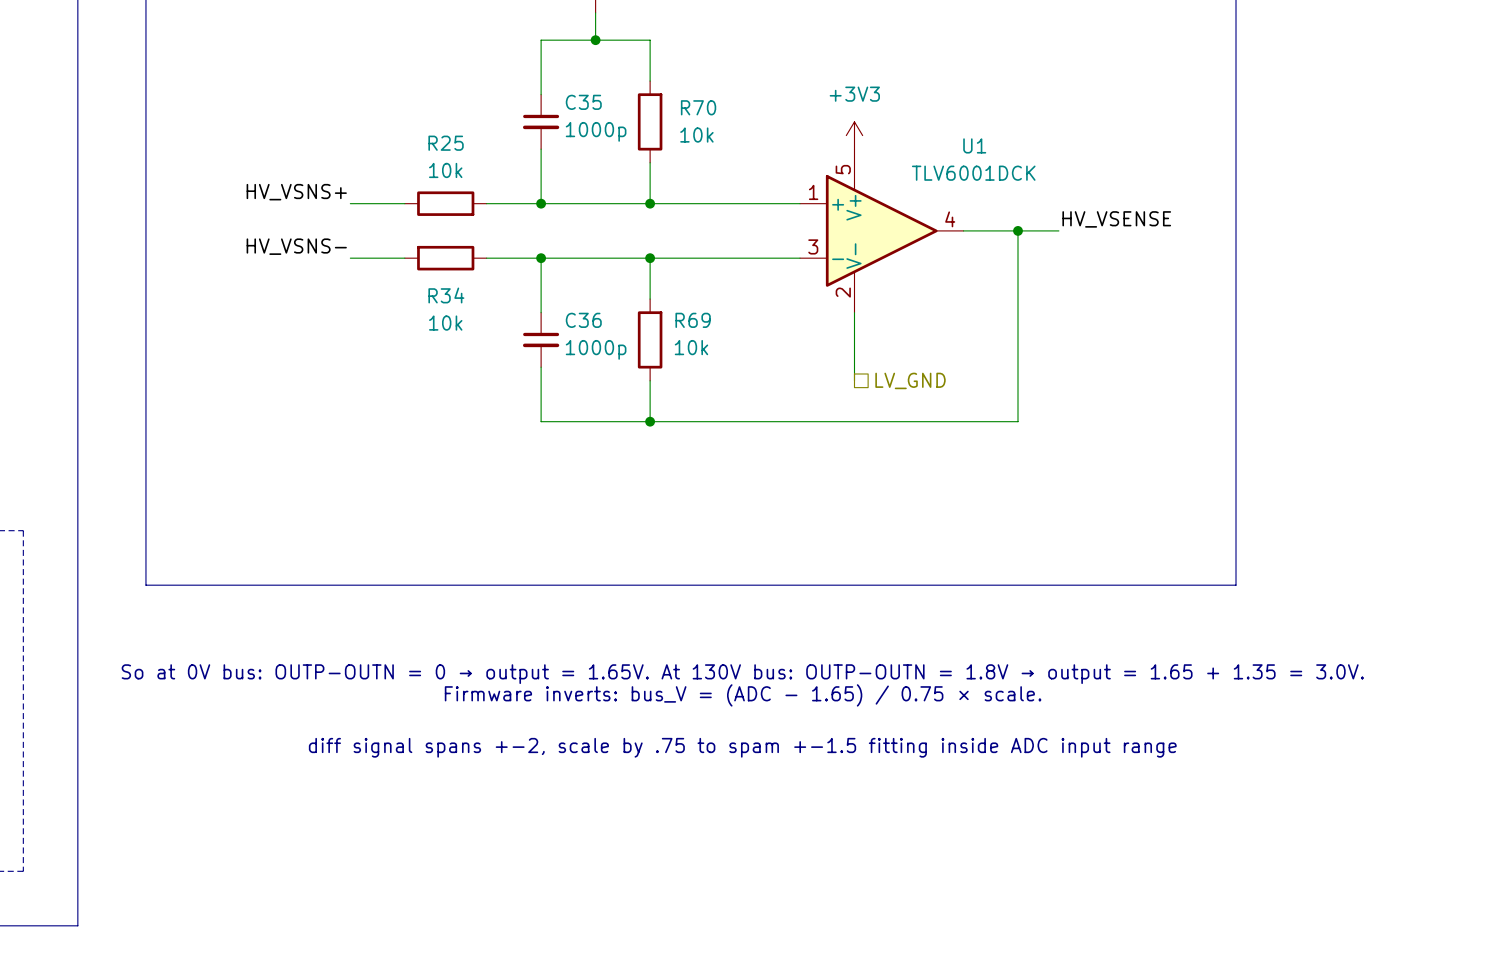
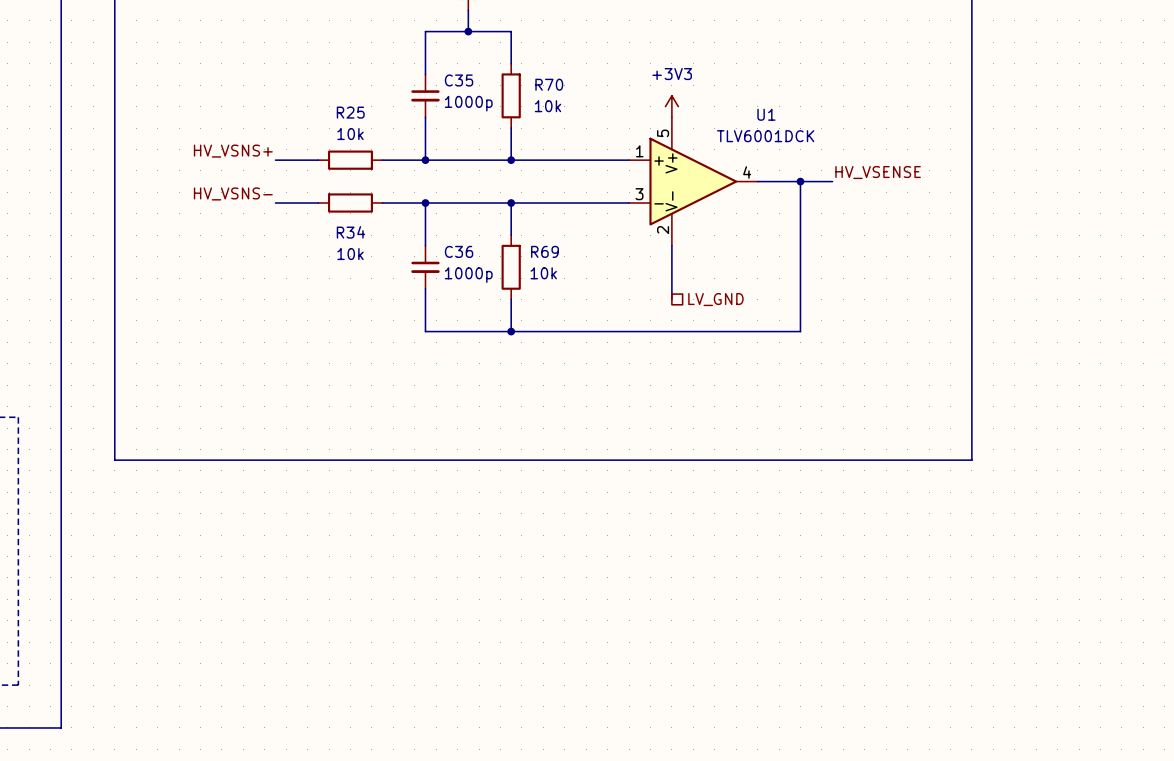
text: So at 0V bus: OUTP−OUTN = 0 → output = 1.65V. At 130V bus: OUTP−OUTN = 1.8V → output = 1.65 + 1.35 = 3.0V. (742, 674) -> none
text: Firmware inverts: bus_V = (ADC − 1.65) / 0.75 × scale. (743, 695) -> none
text: diff signal spans +-2, scale by .75 to spam +-1.5 fitting inside ADC input range (742, 747) -> none

